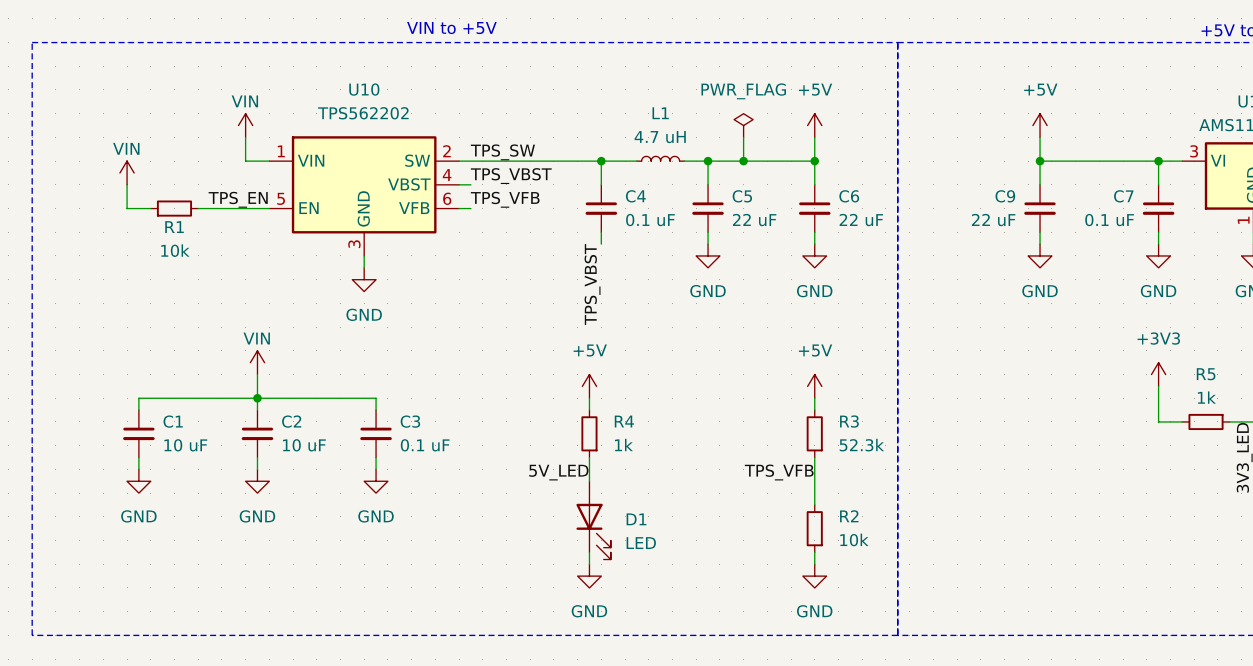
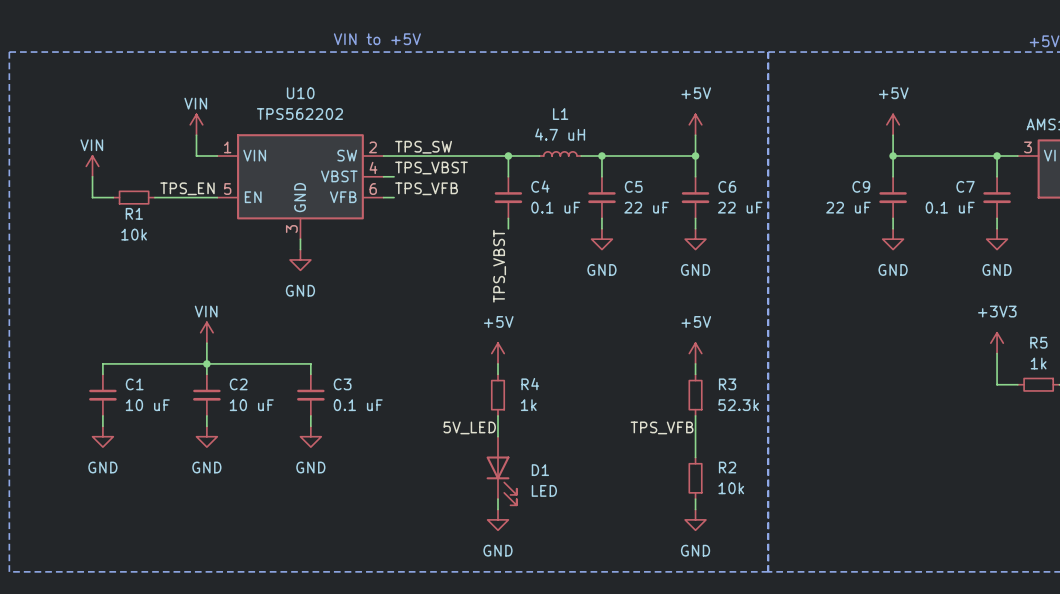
power symbol: PWR_FLAG (743, 125) -> none
wire: (743, 137) (743, 161) -> none
junction: (743, 161) -> none

